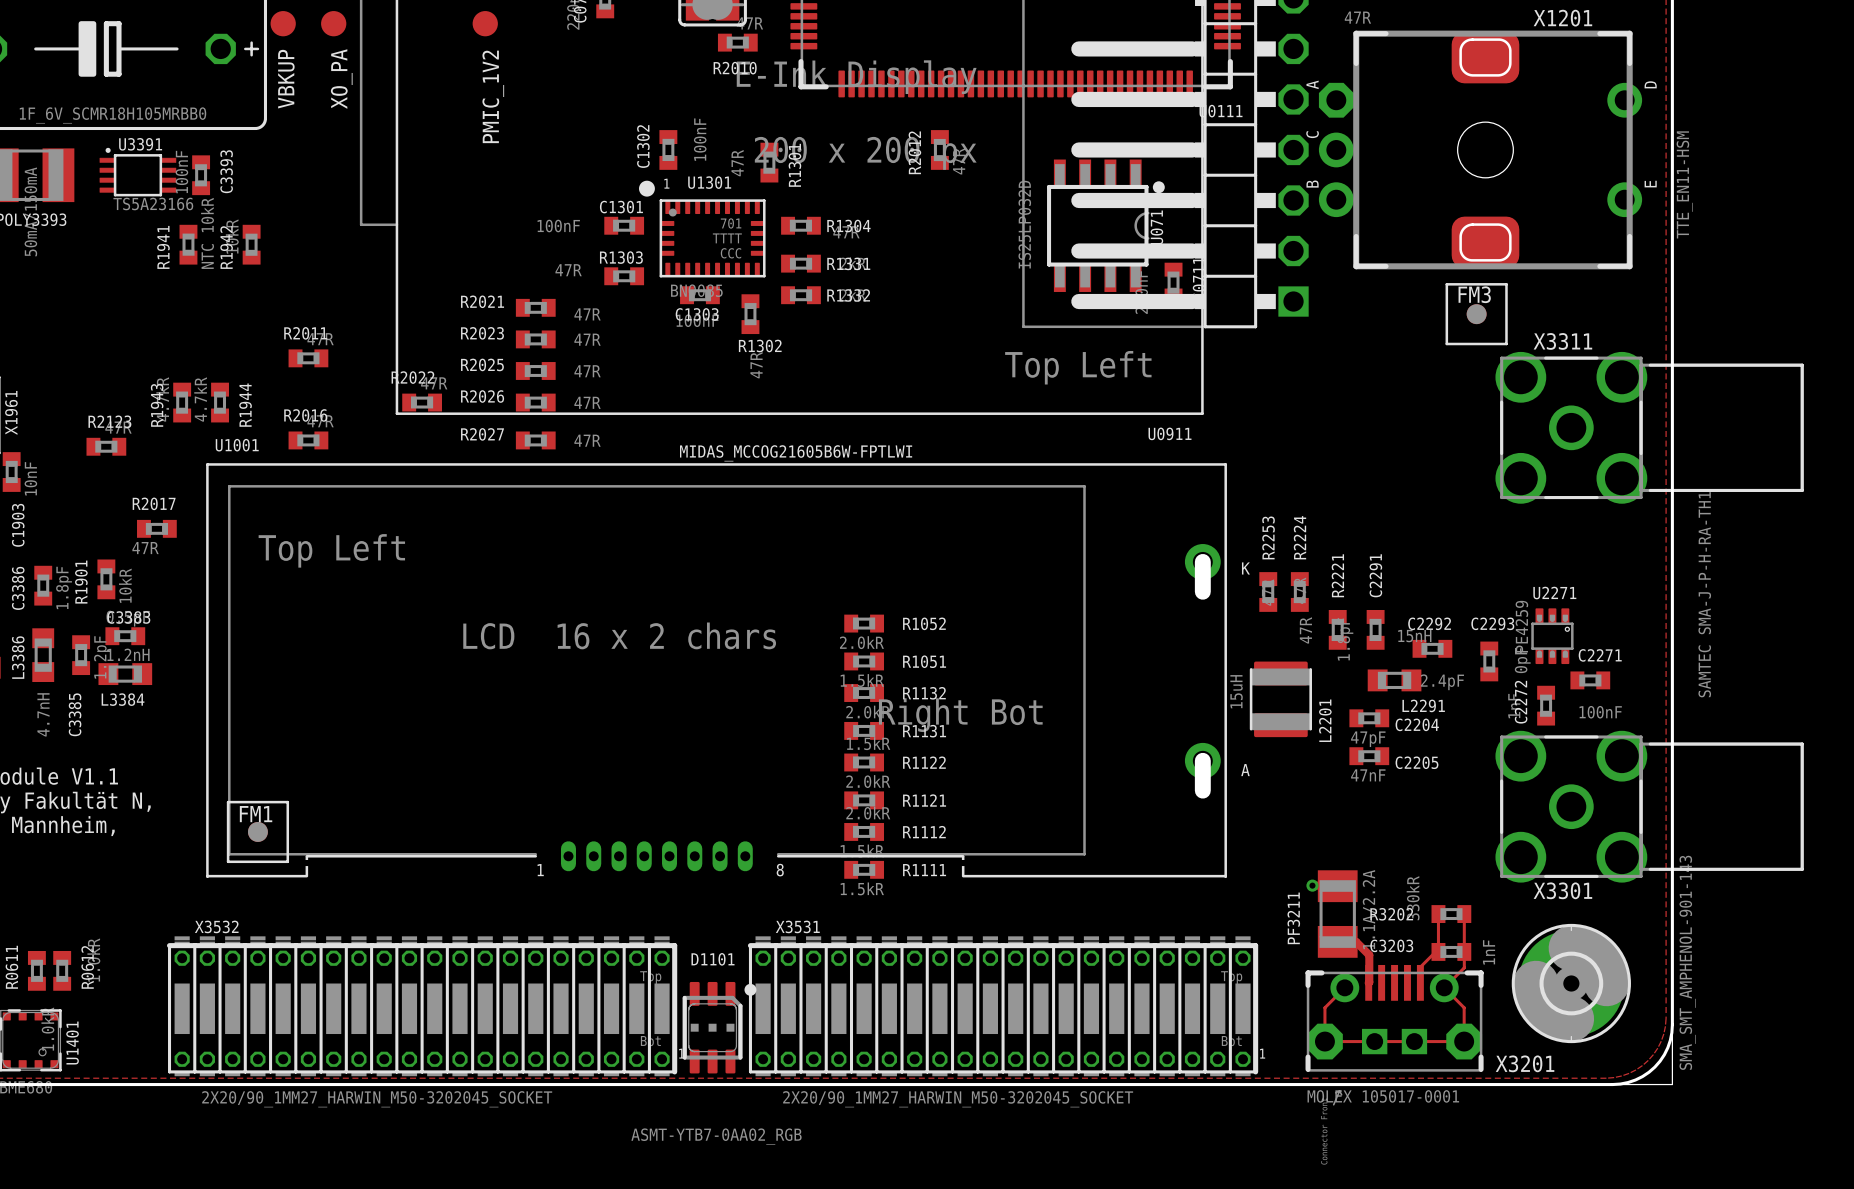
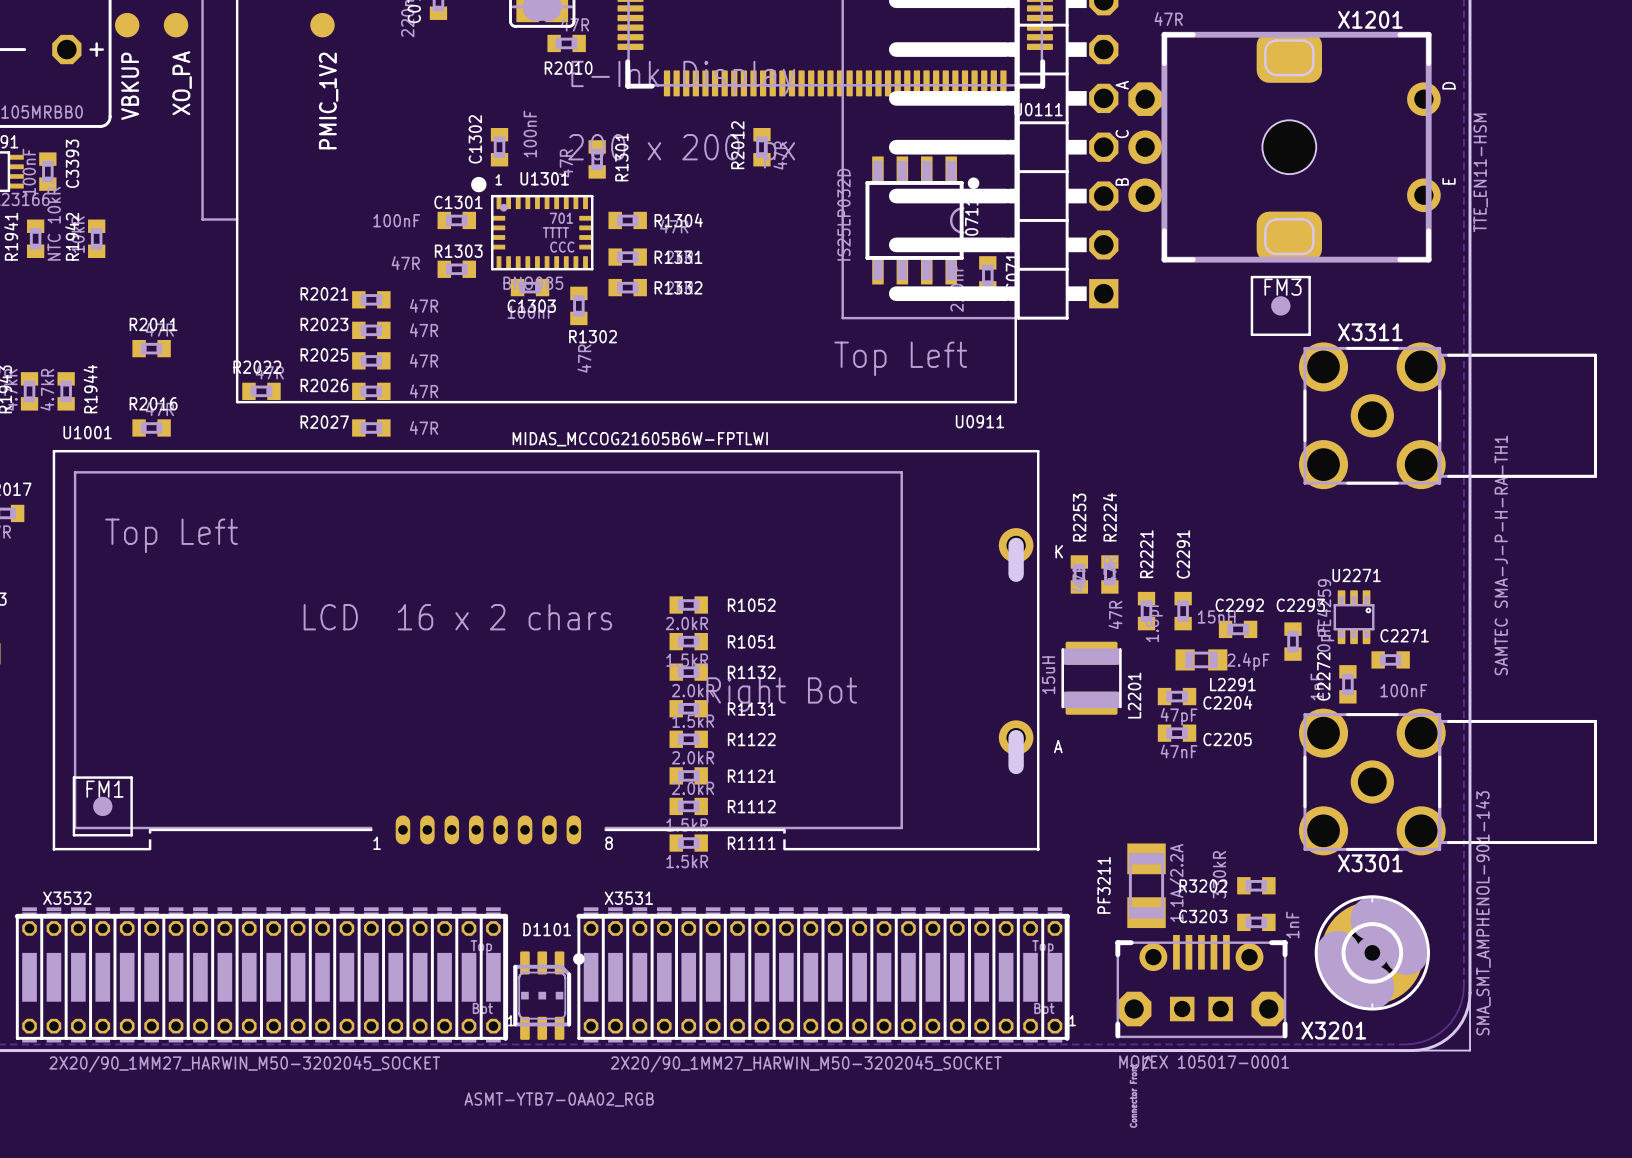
via: (1312, 885) -> none
track: (1438, 914) (1438, 951) (1435, 951) (1419, 967) (1420, 982) -> none
track: (1464, 914) (1464, 967) (1444, 987) (1464, 1007) (1464, 1041) (1324, 1041) (1324, 1007) (1344, 987) -> none
track: (1337, 941) (1356, 941) (1369, 955) (1368, 982) -> none

